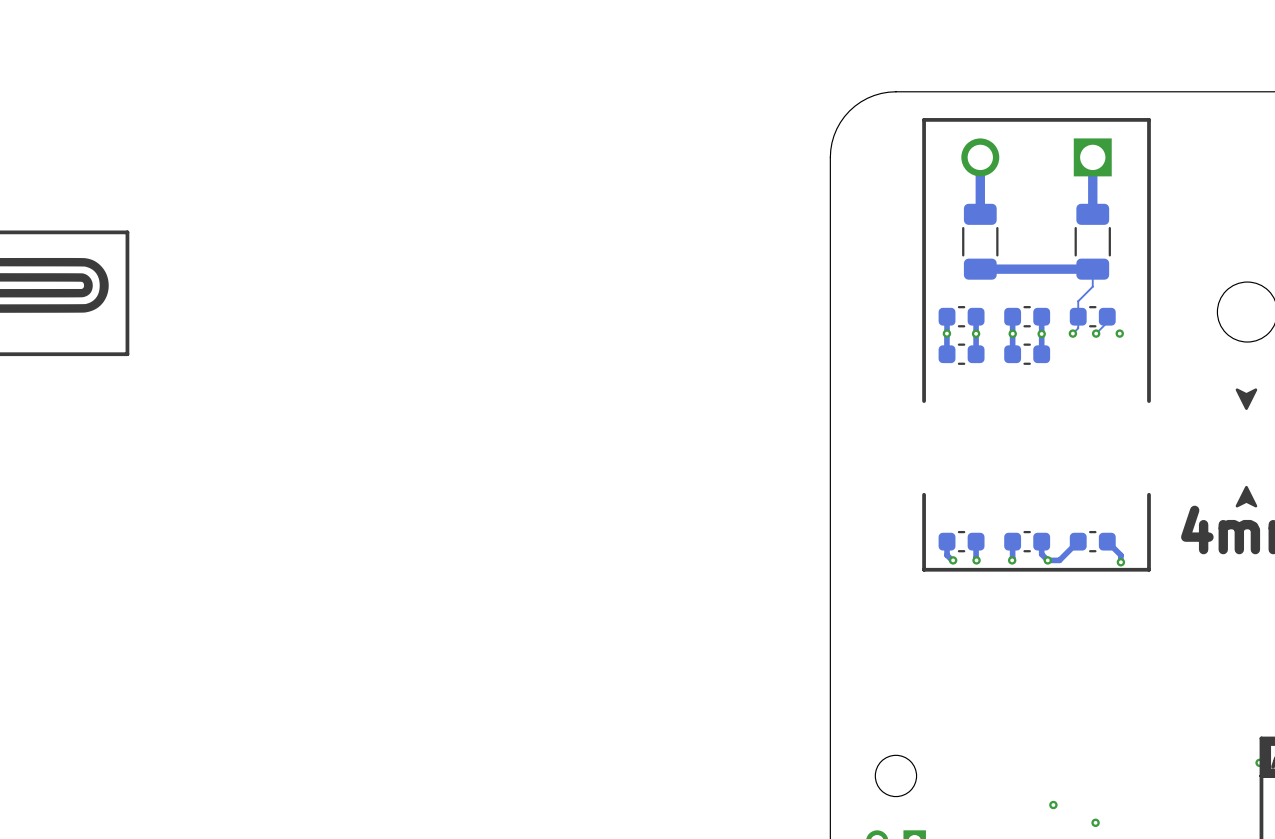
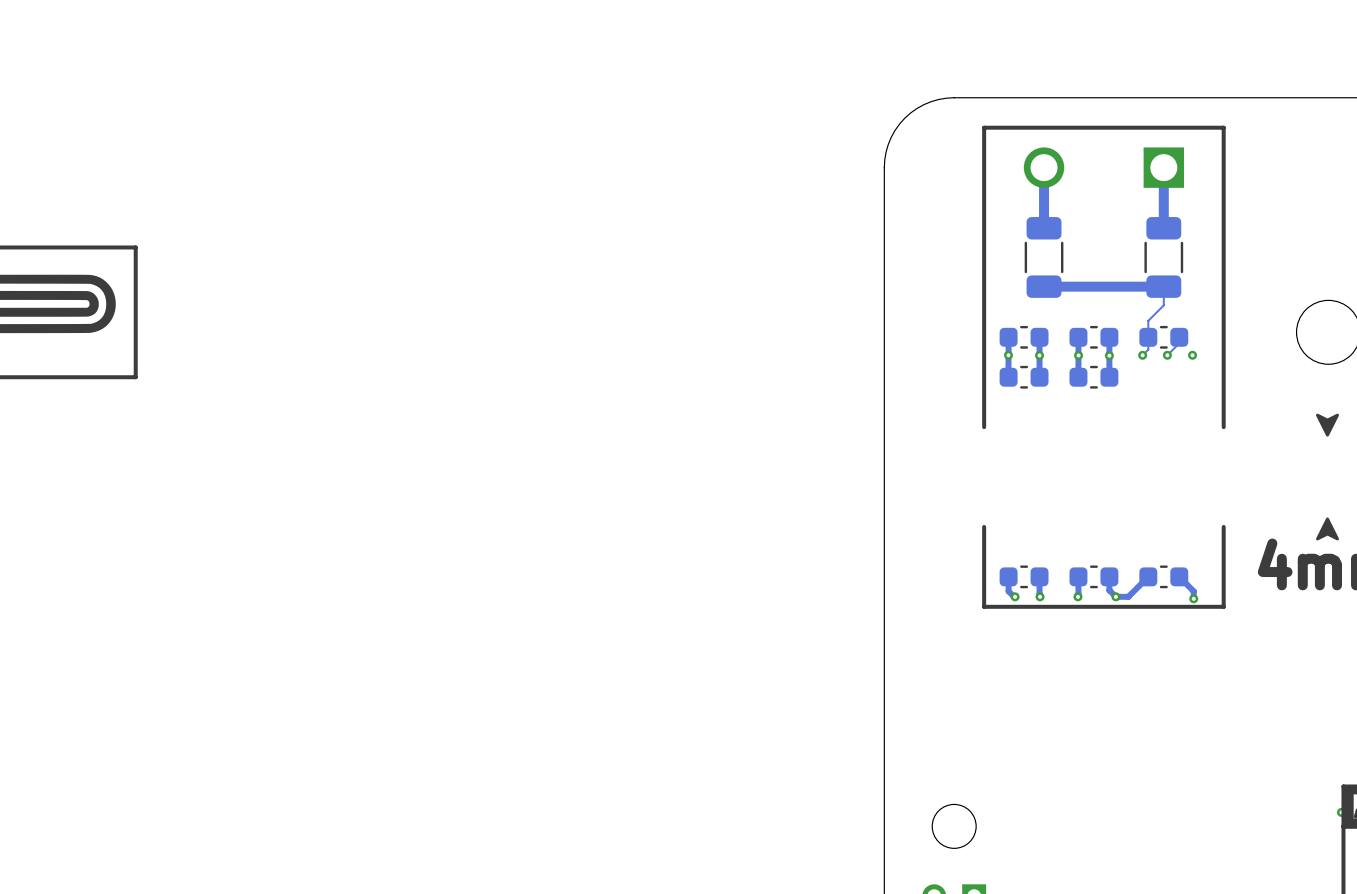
via: (1053, 805) -> none
via: (1095, 822) -> none

